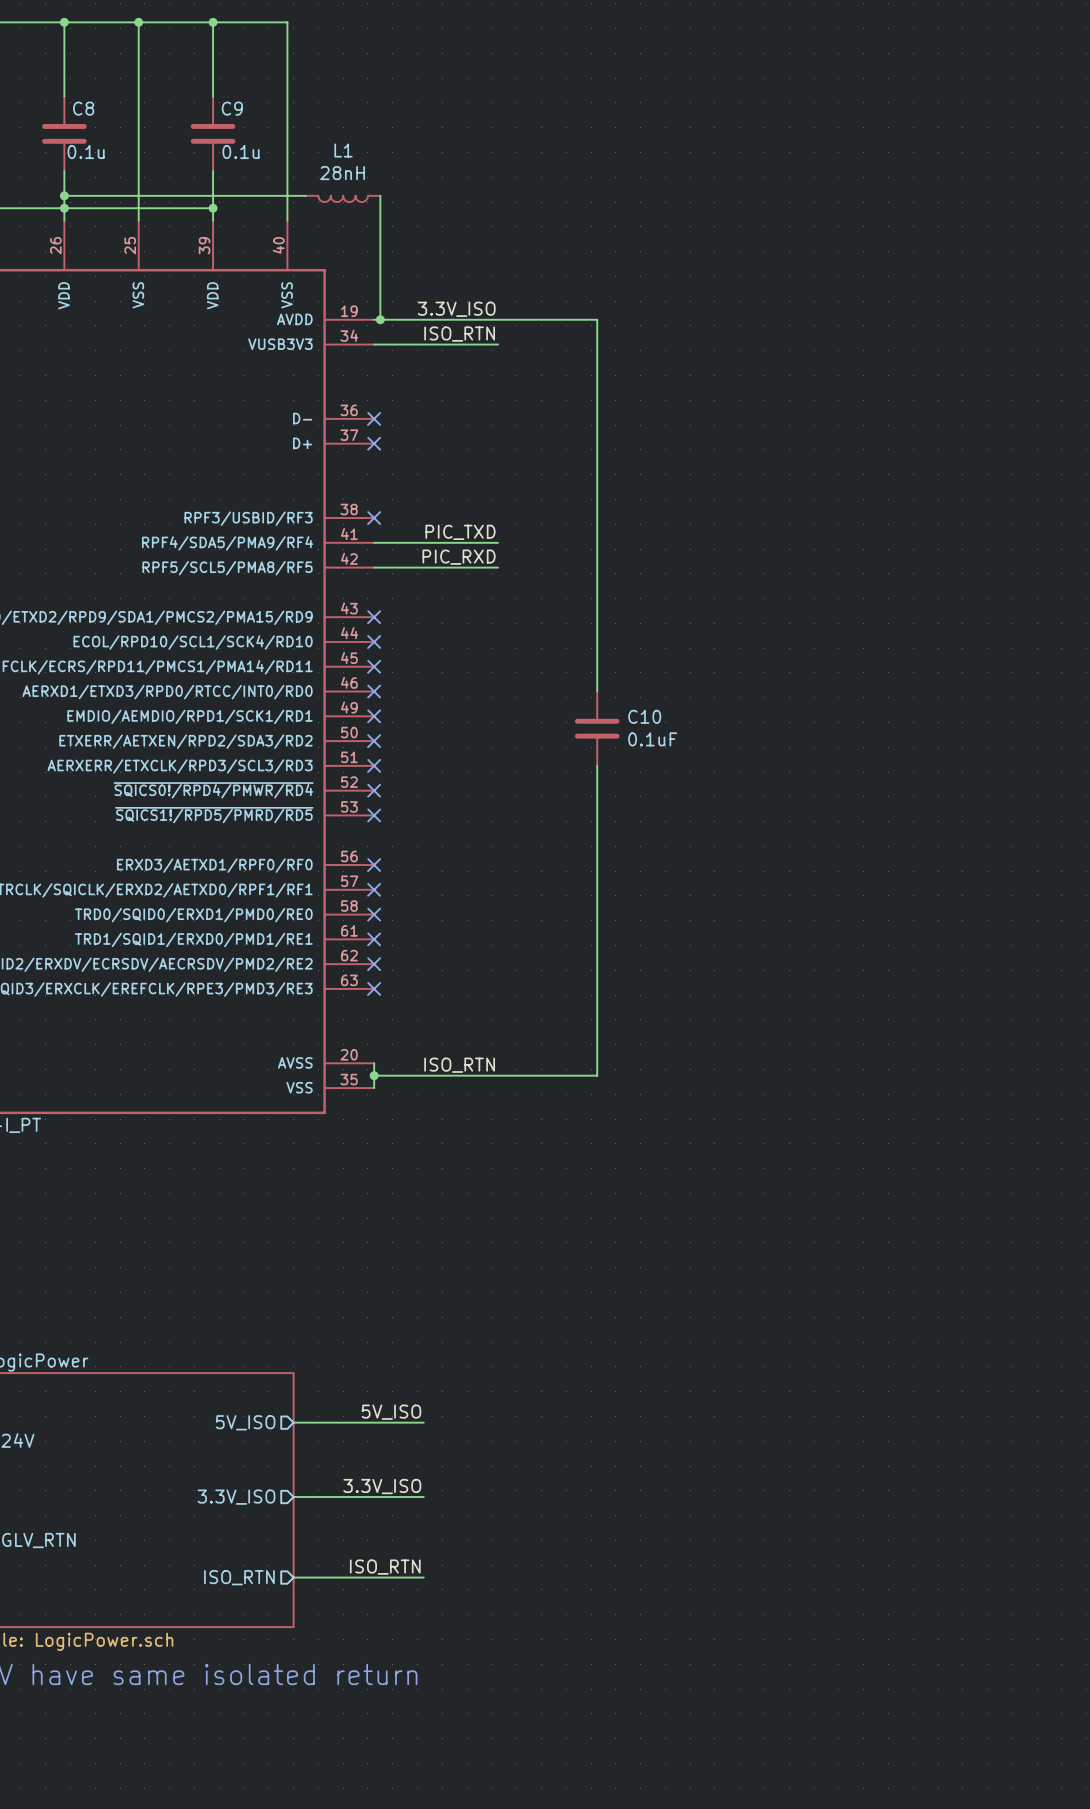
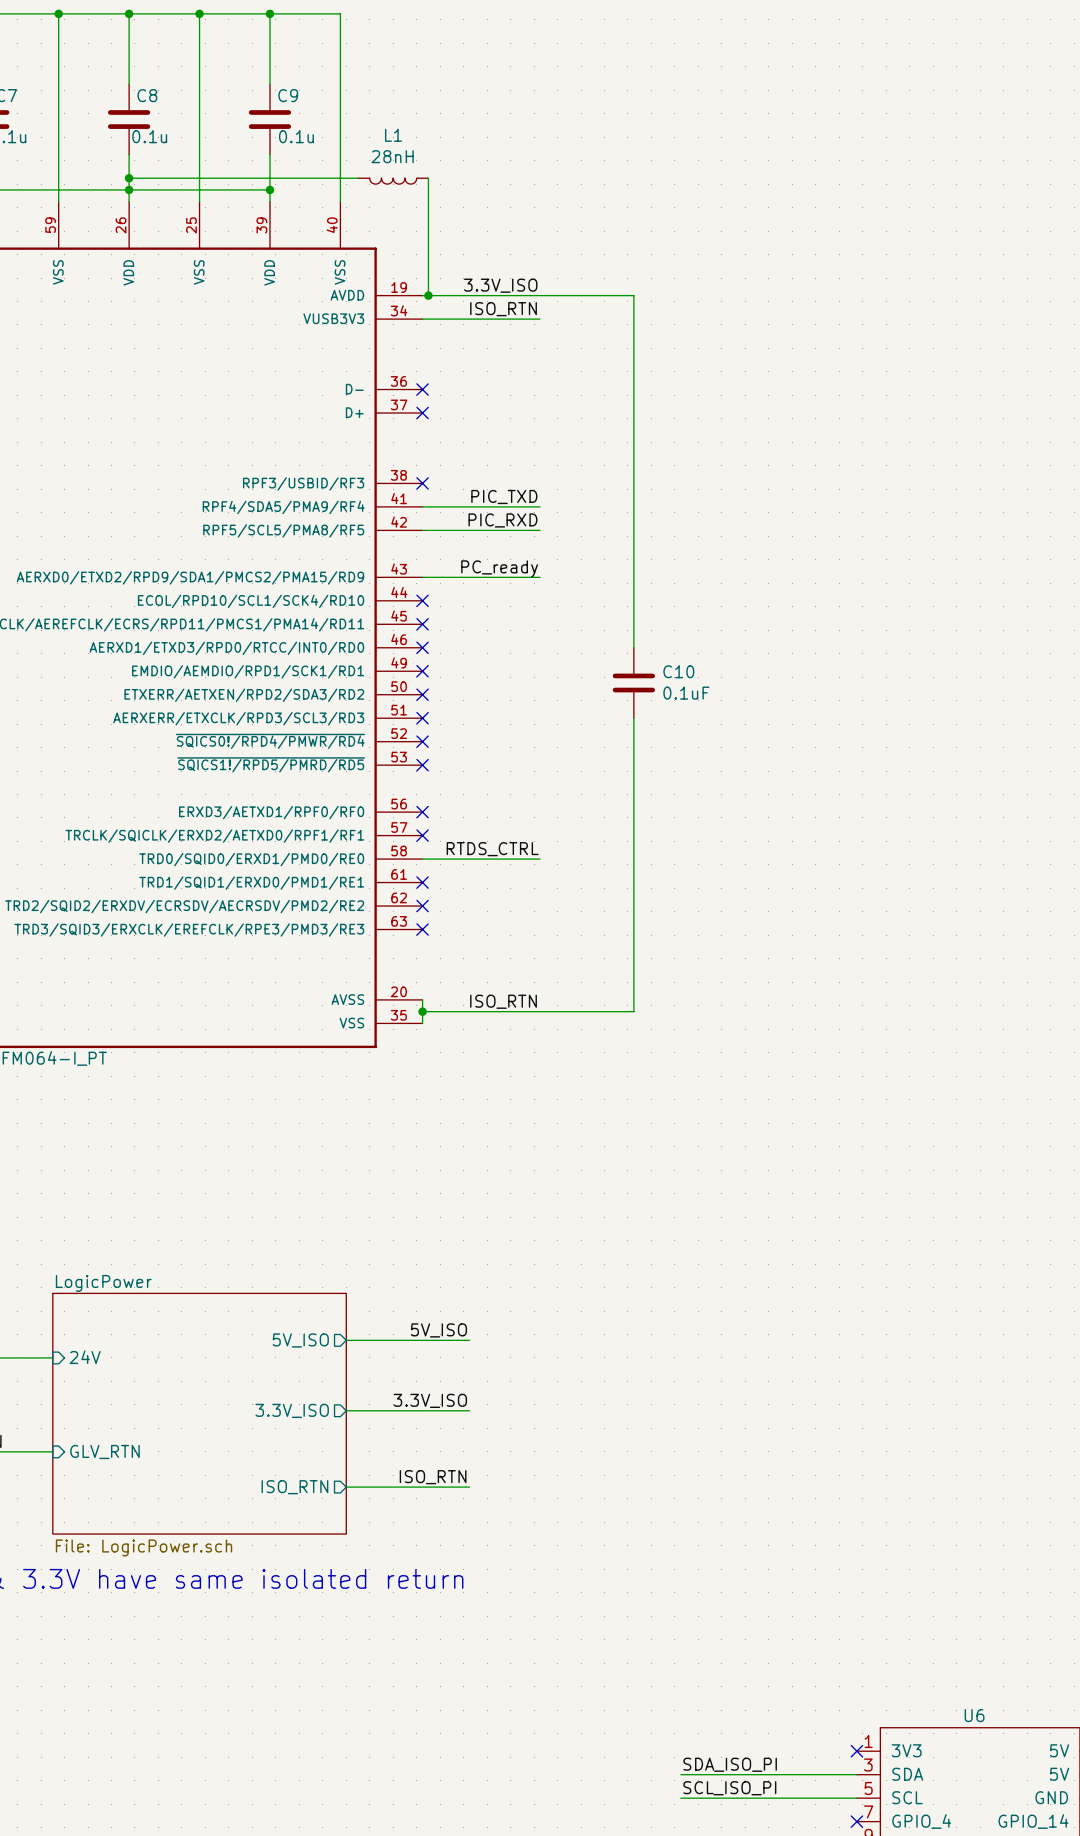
label: none -> PC_ready (499, 568)
wire: none -> (422, 577) (539, 577)
no-connect mark: (374, 617) -> none
label: none -> RTDS_CTRL (492, 849)
wire: none -> (422, 859) (539, 859)
no-connect mark: (374, 914) -> none

